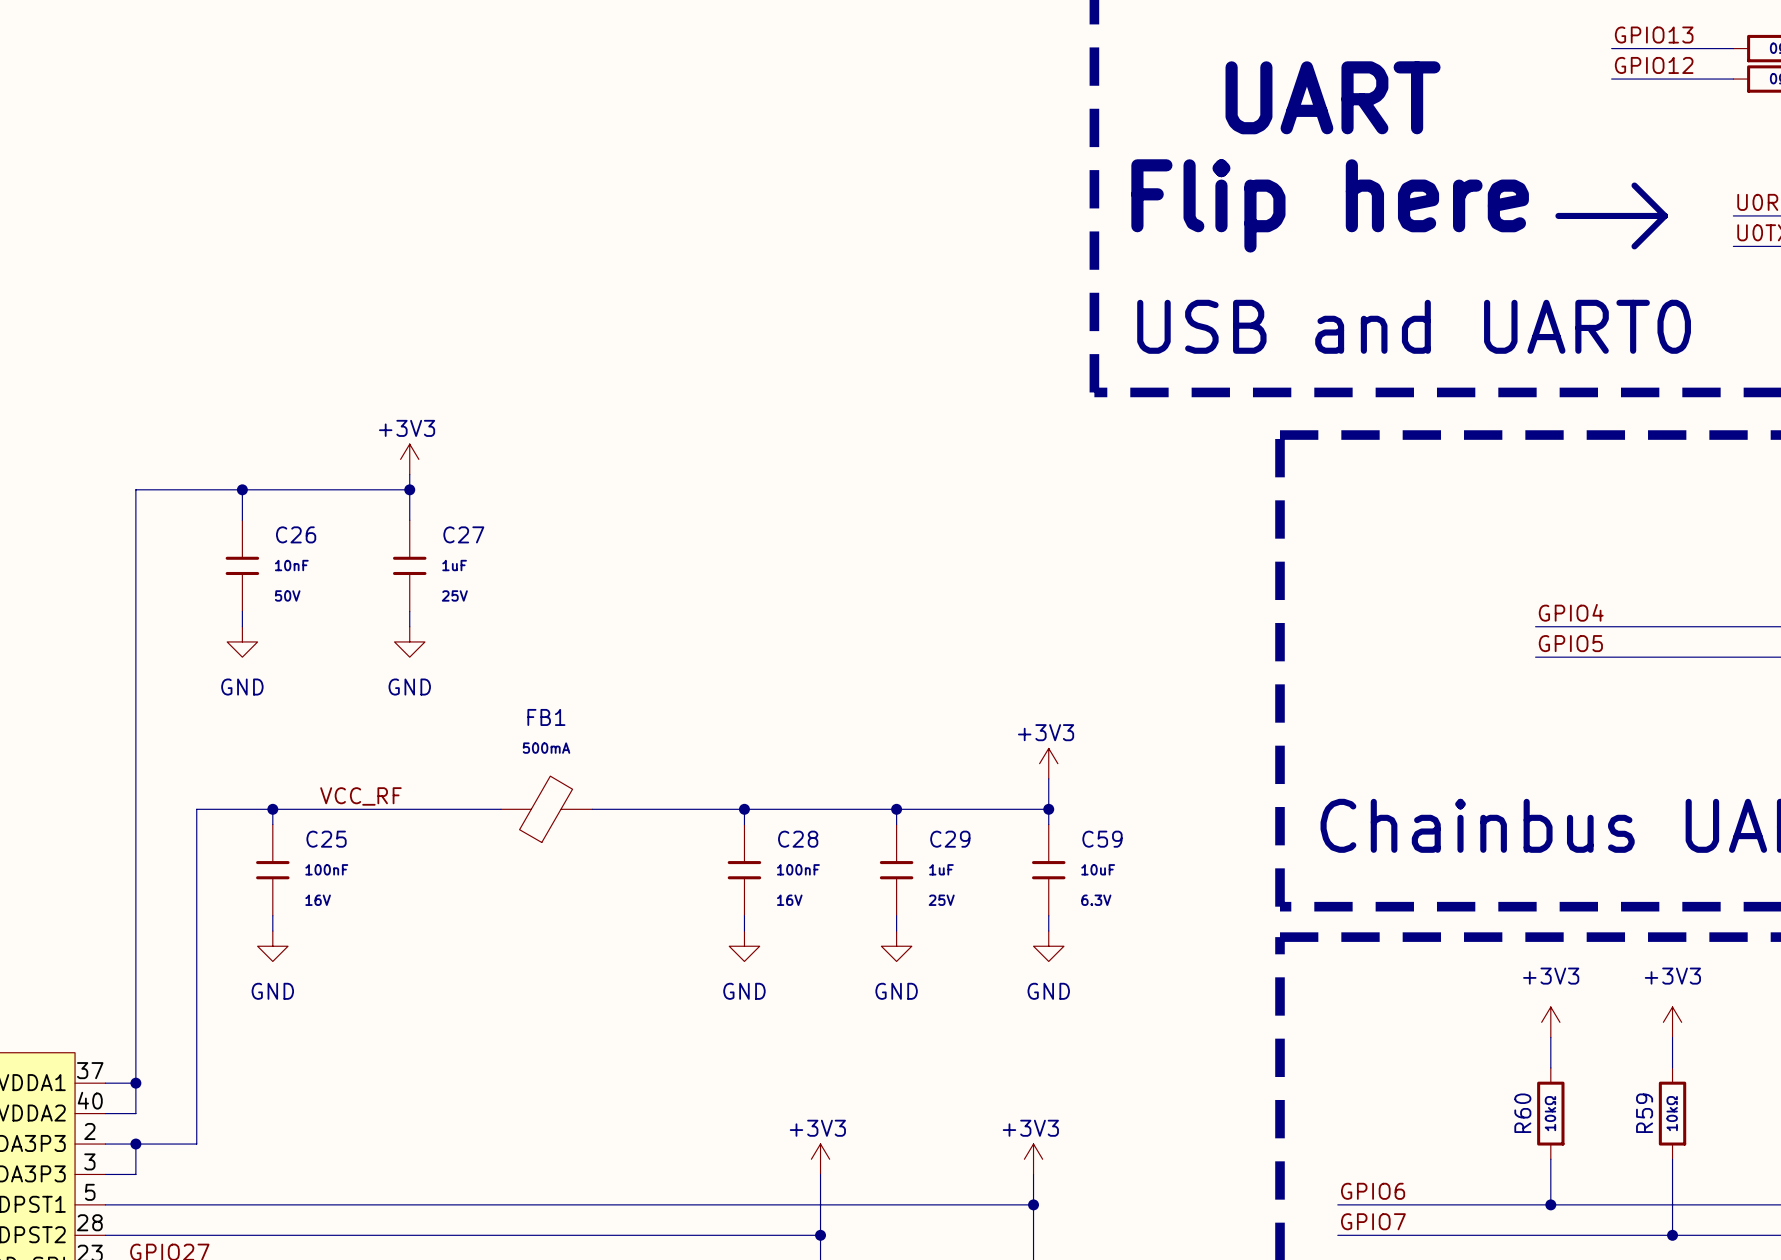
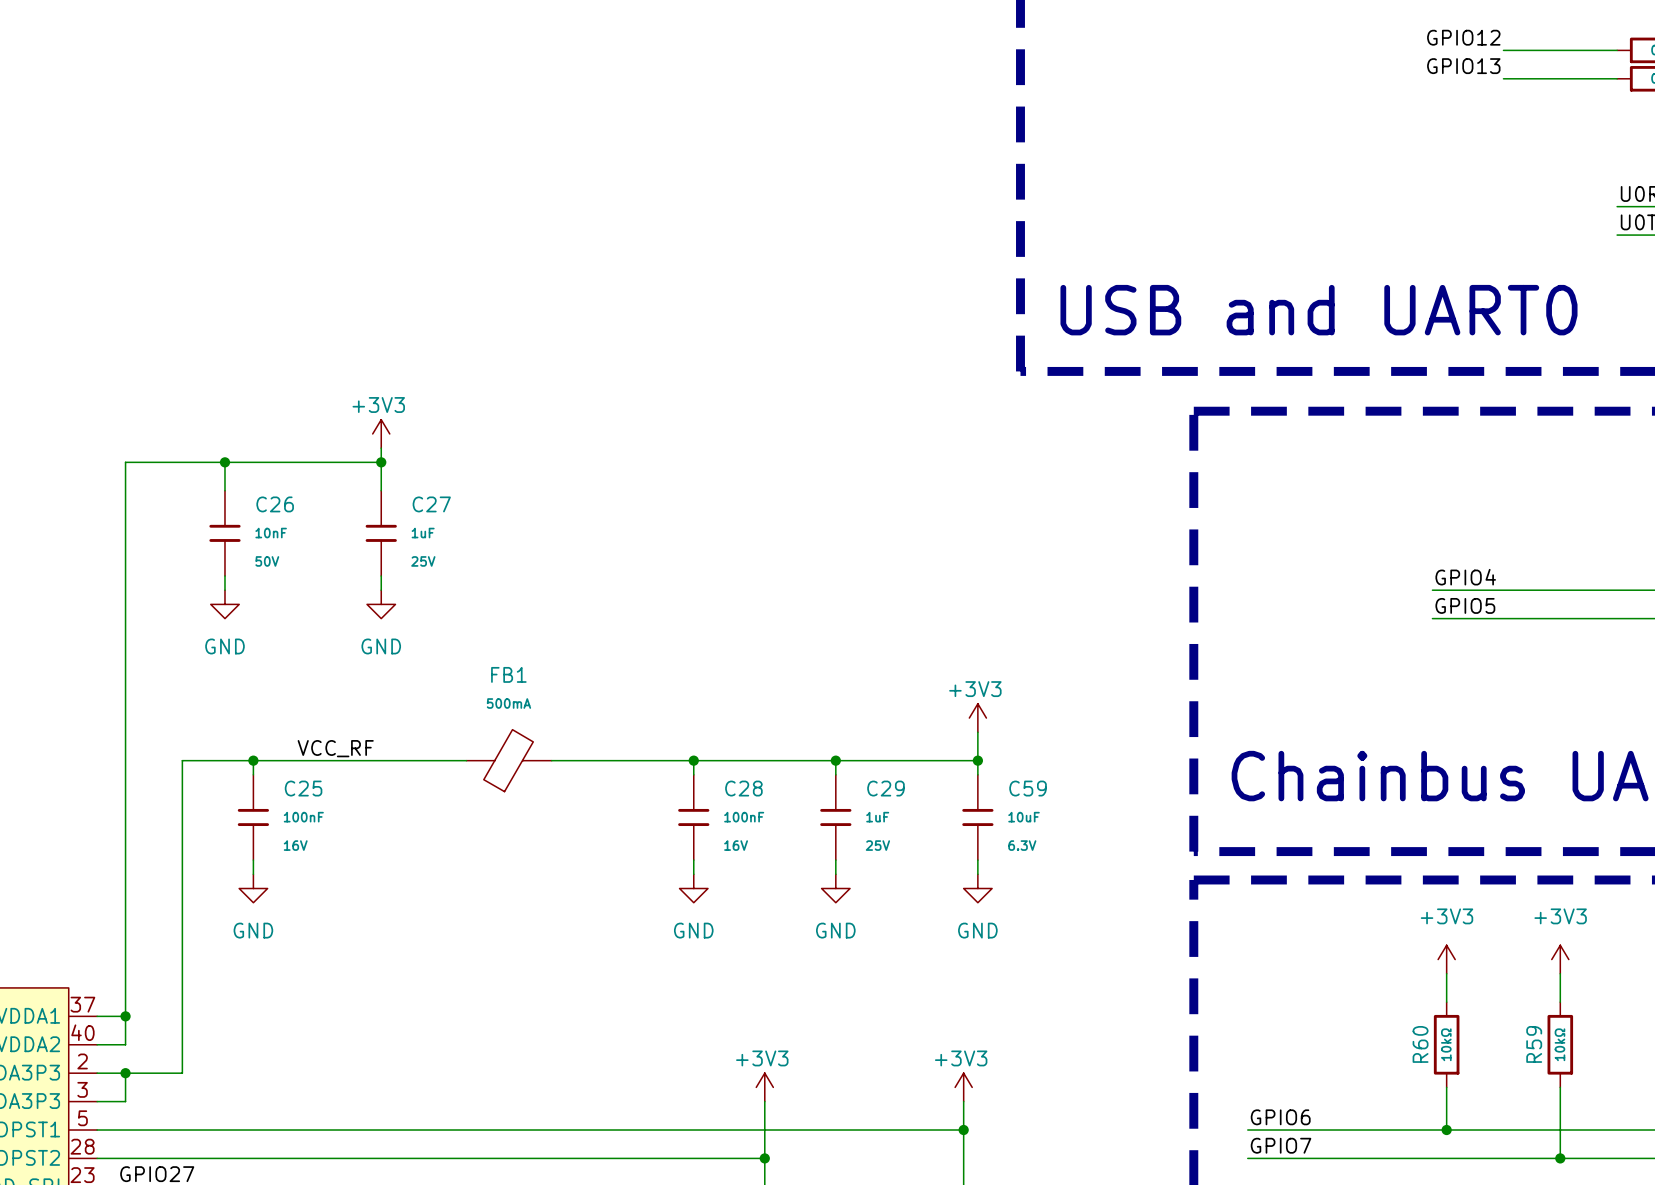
label: GPIO13 (1654, 35) -> GPIO12 (1463, 37)
label: GPIO12 (1654, 65) -> GPIO13 (1463, 66)
text: UART (1333, 97) -> none
line: (1634, 185) (1664, 215) -> none
text: Flip here (1330, 205) -> none
line: (1558, 215) (1664, 215) -> none
line: (1664, 215) (1634, 246) -> none

